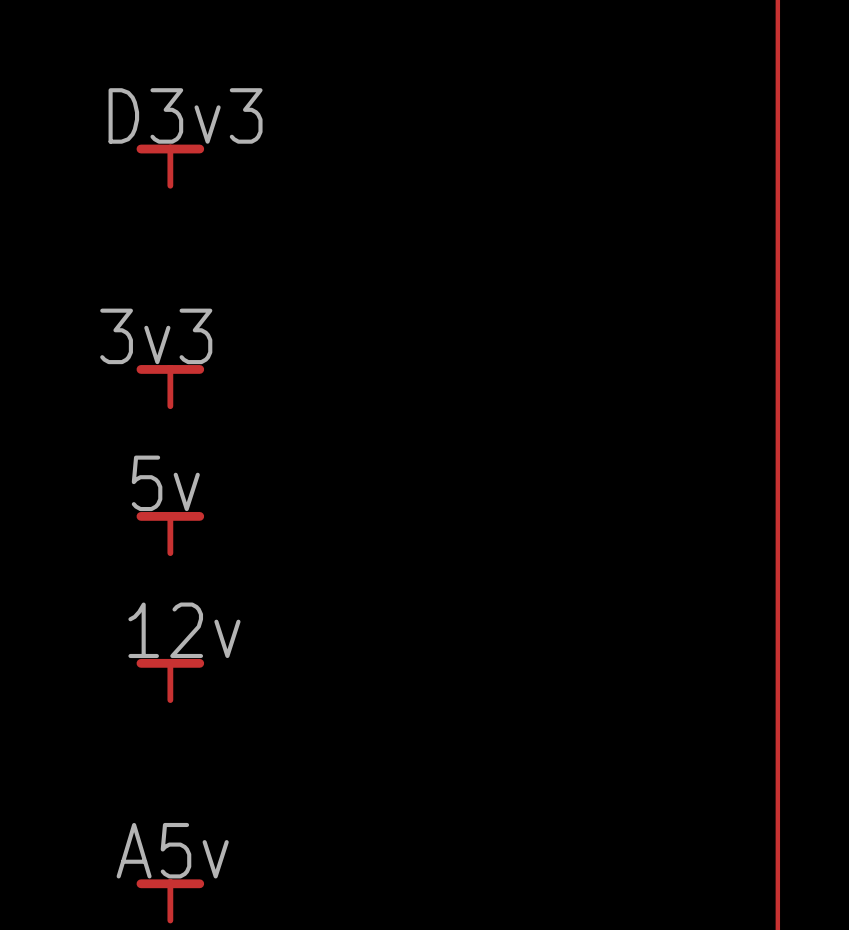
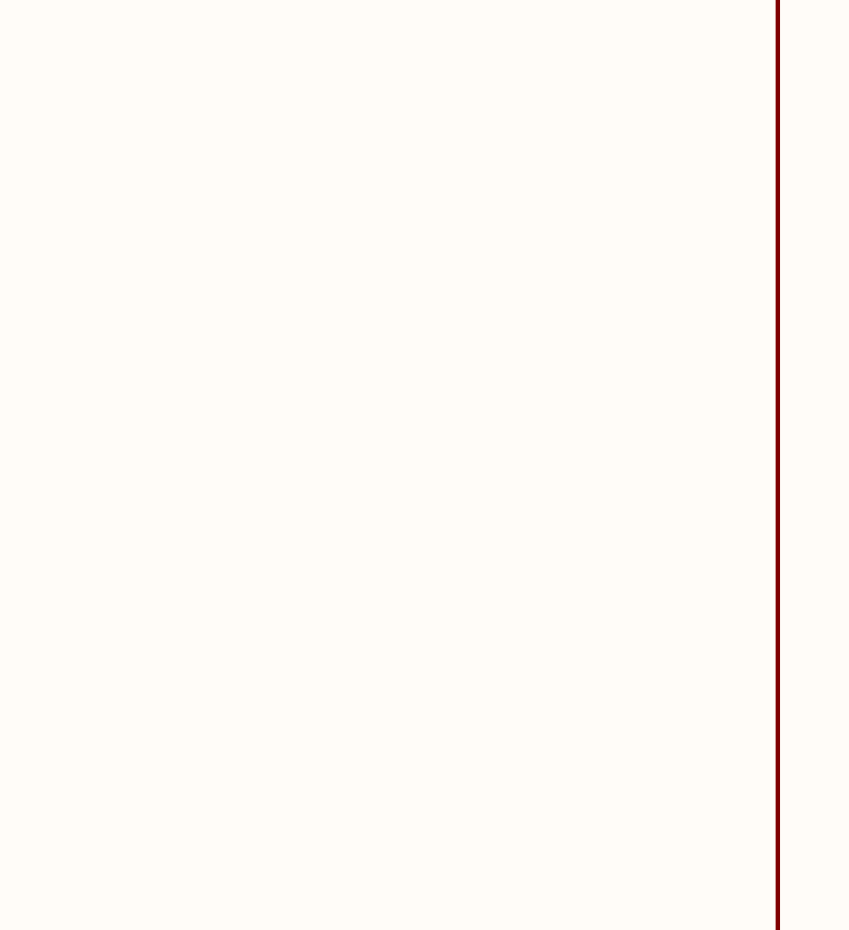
power symbol: (170, 166) -> none
power symbol: (170, 387) -> none
power symbol: (170, 534) -> none
power symbol: (170, 680) -> none
power symbol: (170, 901) -> none

